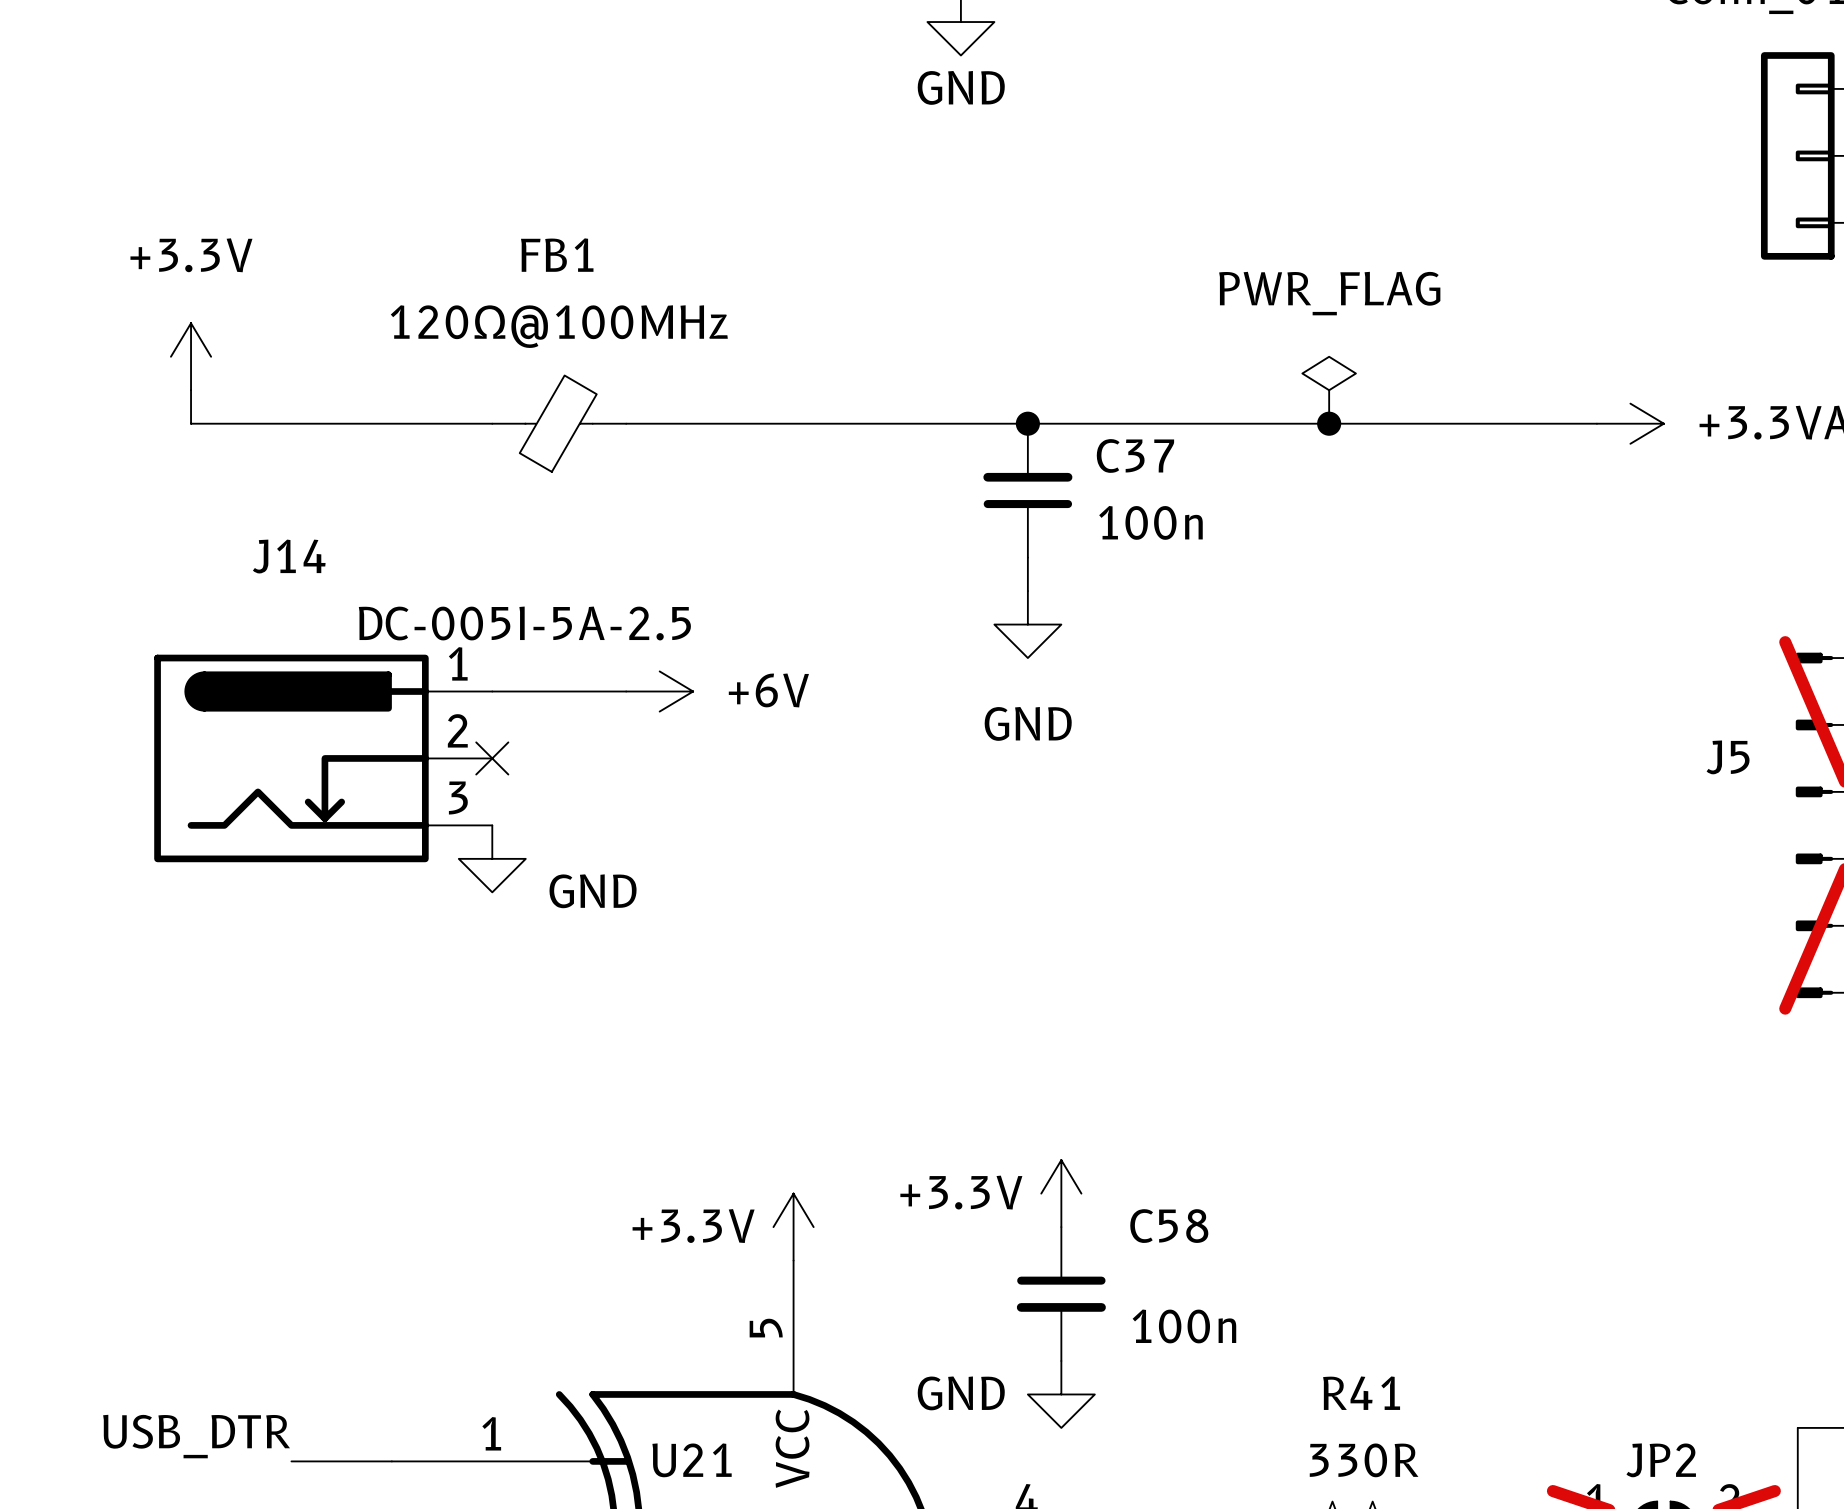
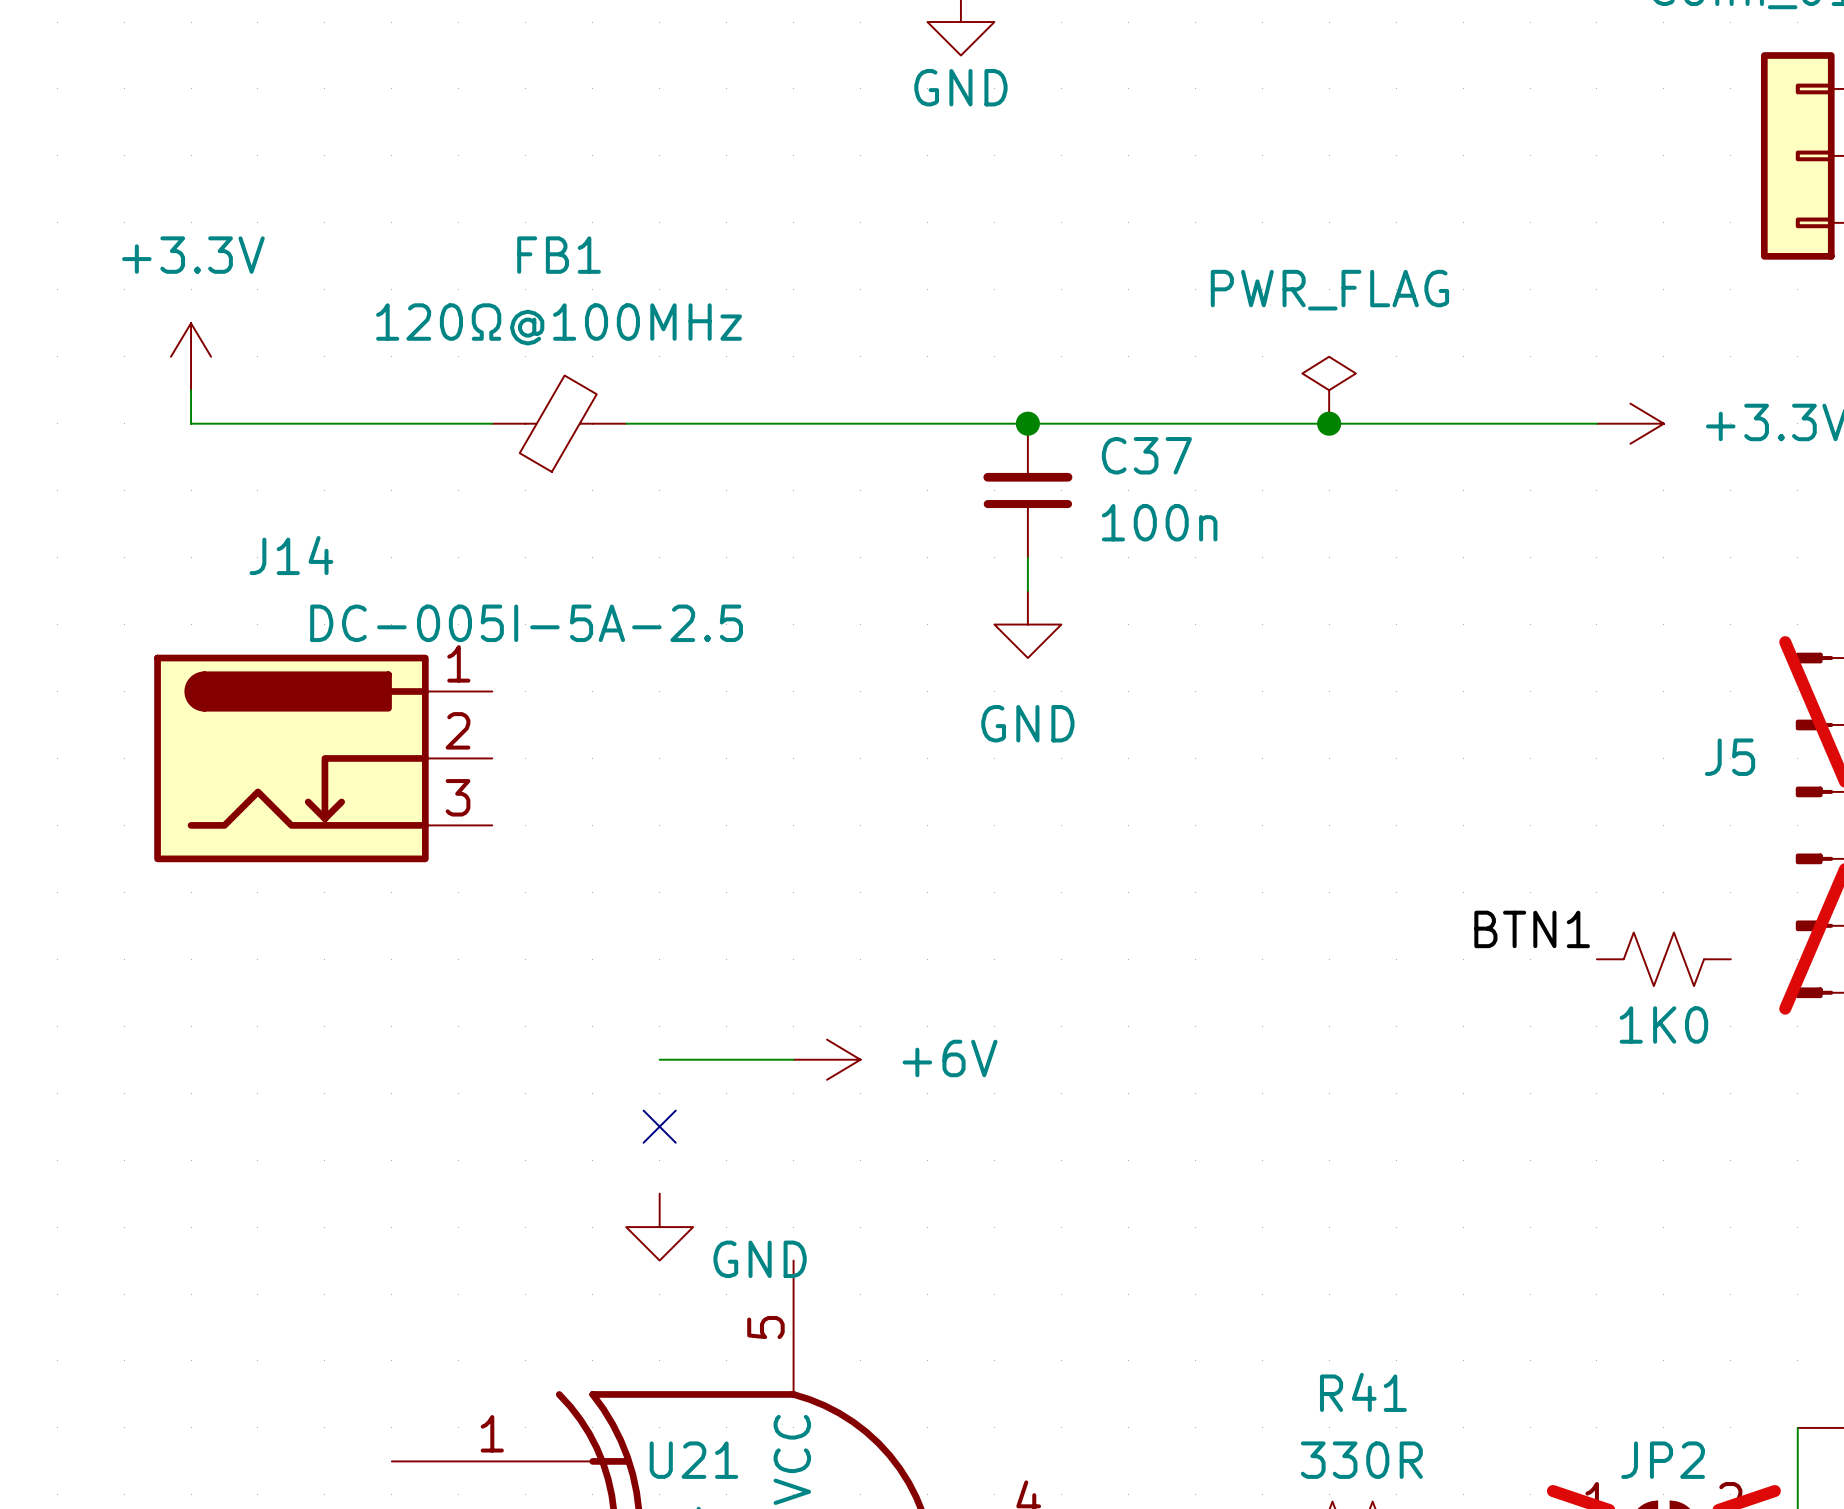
wire: (492, 691) (626, 691) -> (659, 1059) (793, 1059)
power symbol position: +6V (659, 691) -> +6V (827, 1059)
no-connect mark: (492, 758) -> none
power symbol: GND (492, 858) -> none
label: none -> BTN1 (1532, 929)
part: none -> 1K0 (1663, 959)
no-connect mark: none -> (659, 1126)
power symbol: +3.3V (1061, 1193) -> none
power symbol: none -> GND (659, 1227)
power symbol: +3.3V (793, 1227) -> none
C58: 100n (1061, 1294) -> none
power symbol: GND (1061, 1394) -> none
label: USB_DTR (196, 1436) -> none
wire: (291, 1461) (391, 1461) -> none

